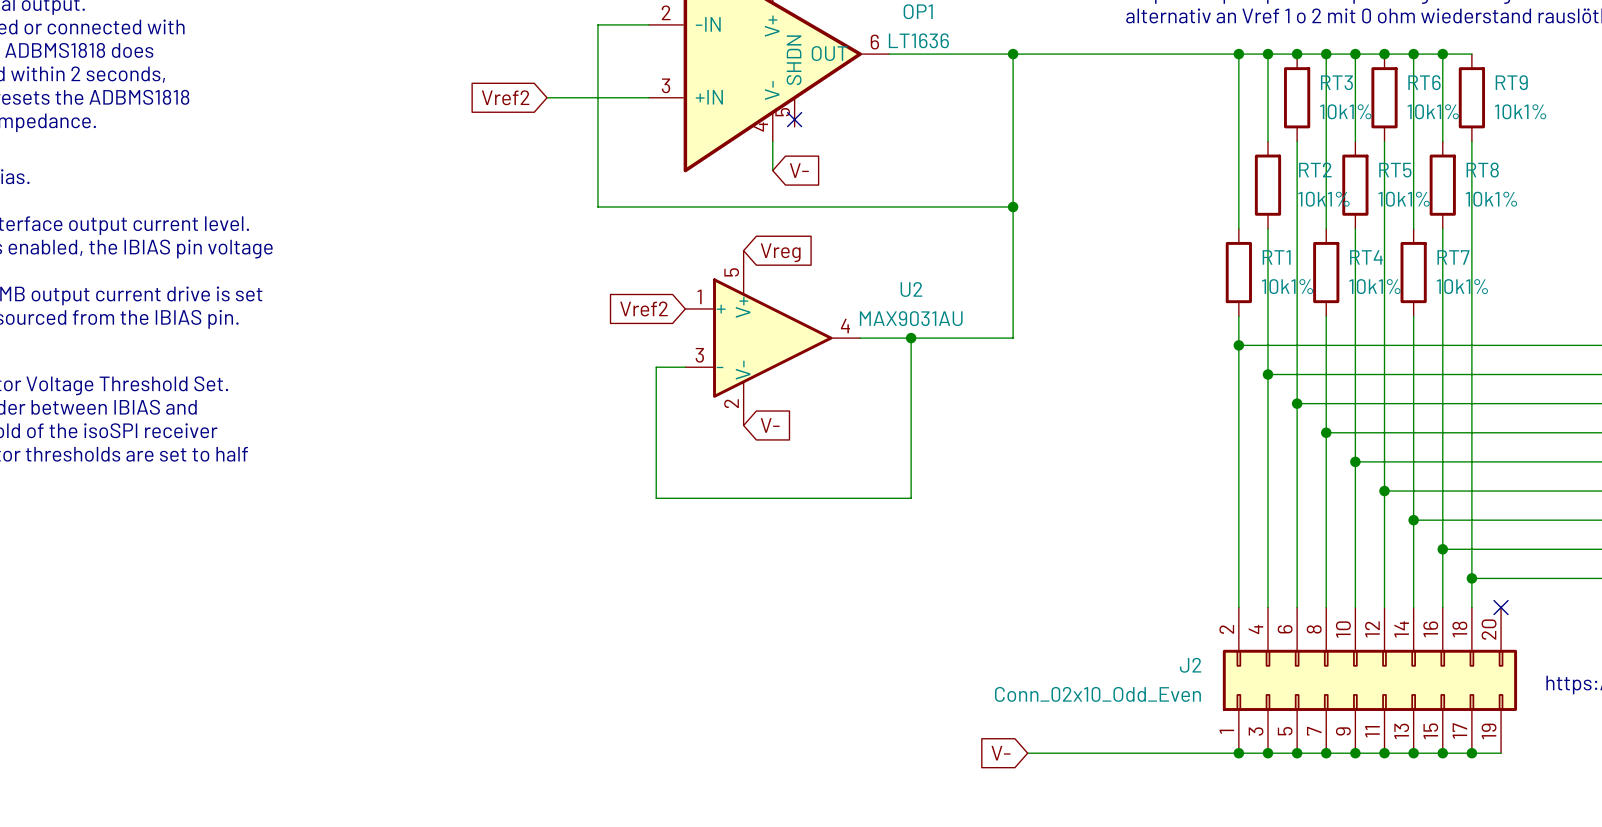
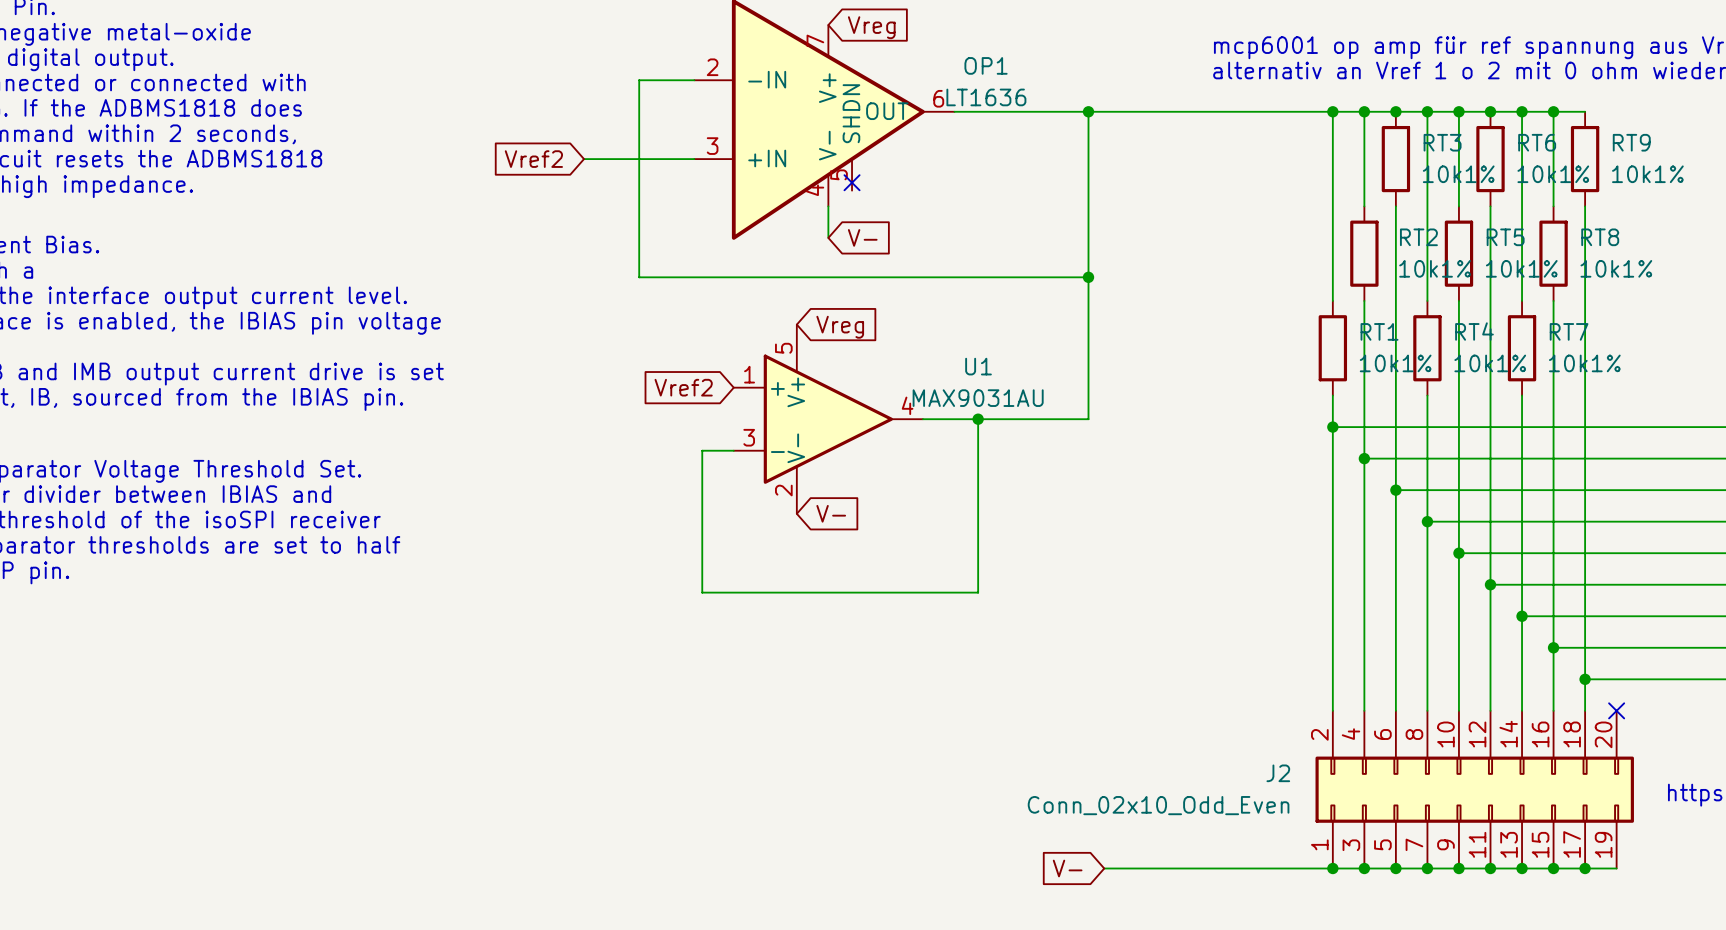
U2 name: U2 (911, 289) -> U1 (978, 366)

